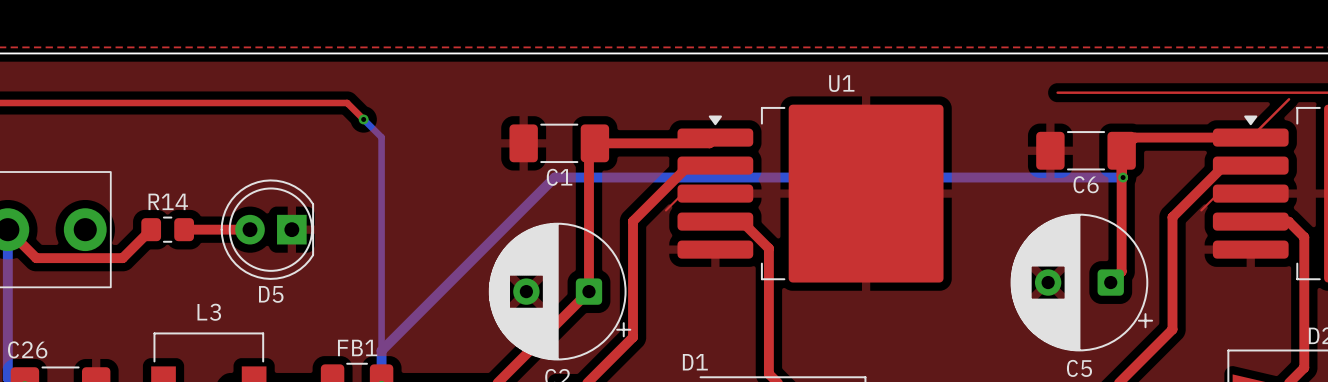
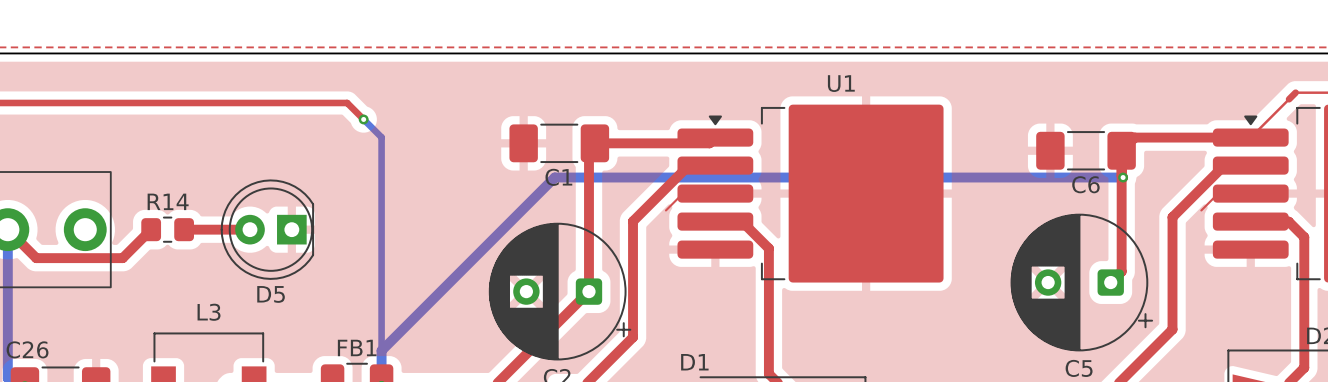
top track: (1057, 92) (1295, 92) -> (1289, 99) (1295, 92)

